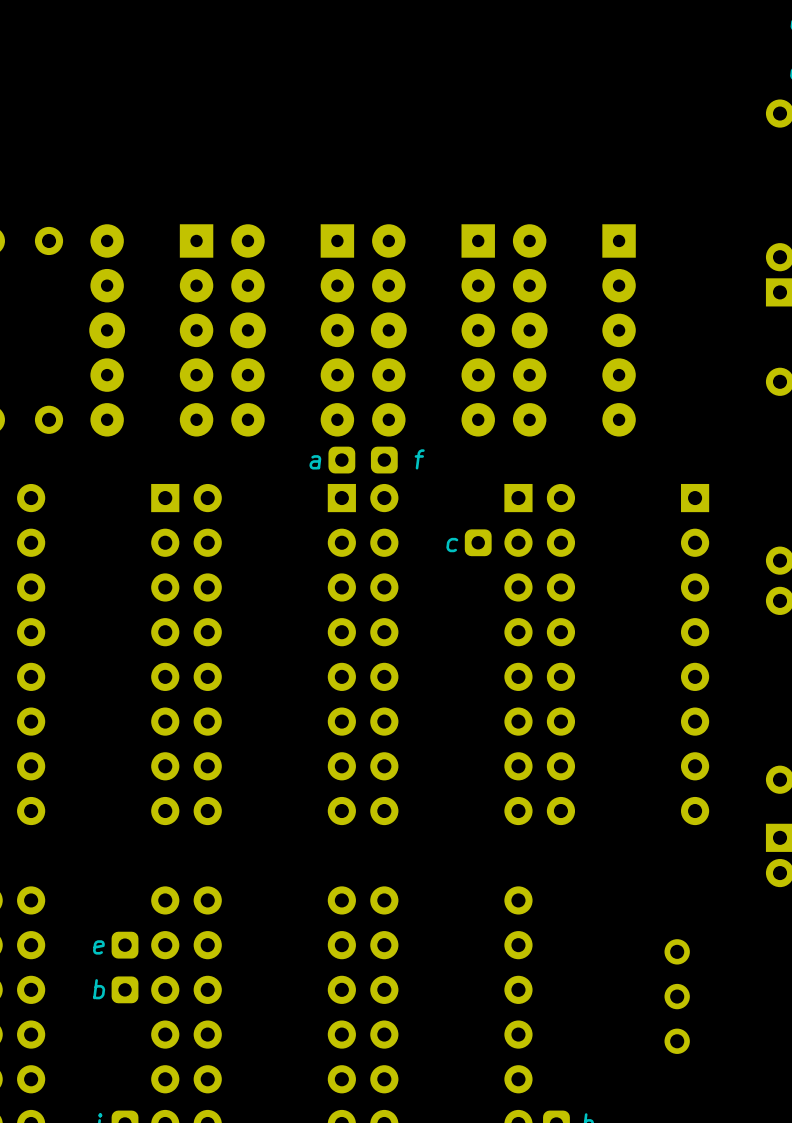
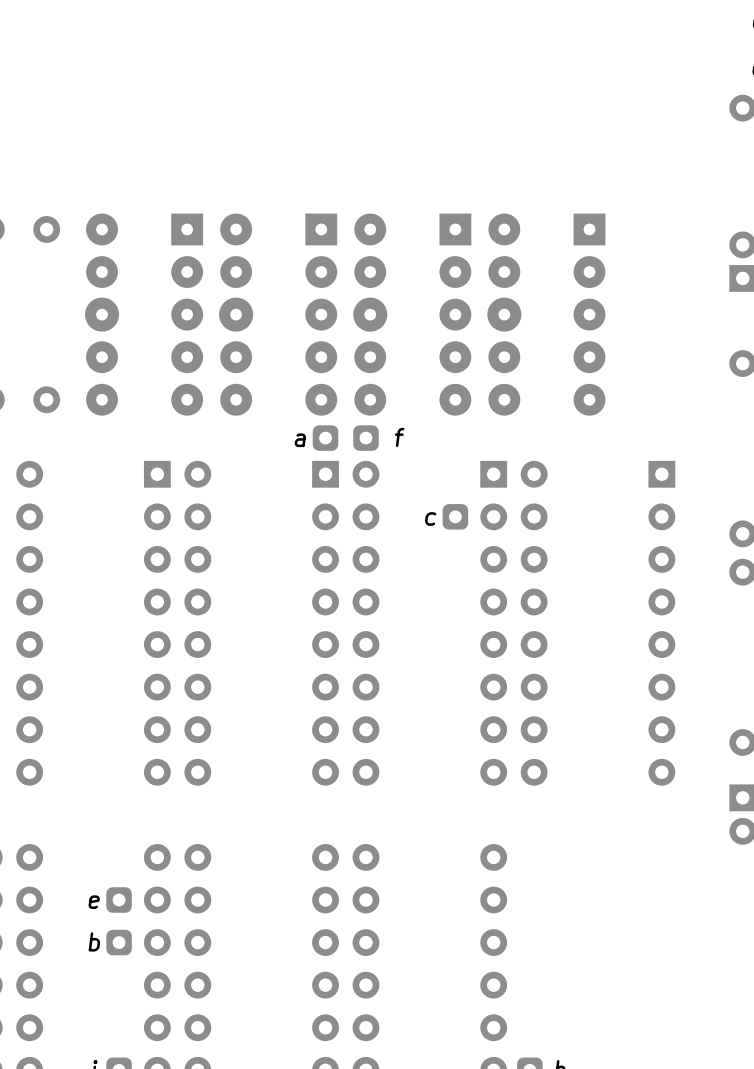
part: (677, 996) -> none

